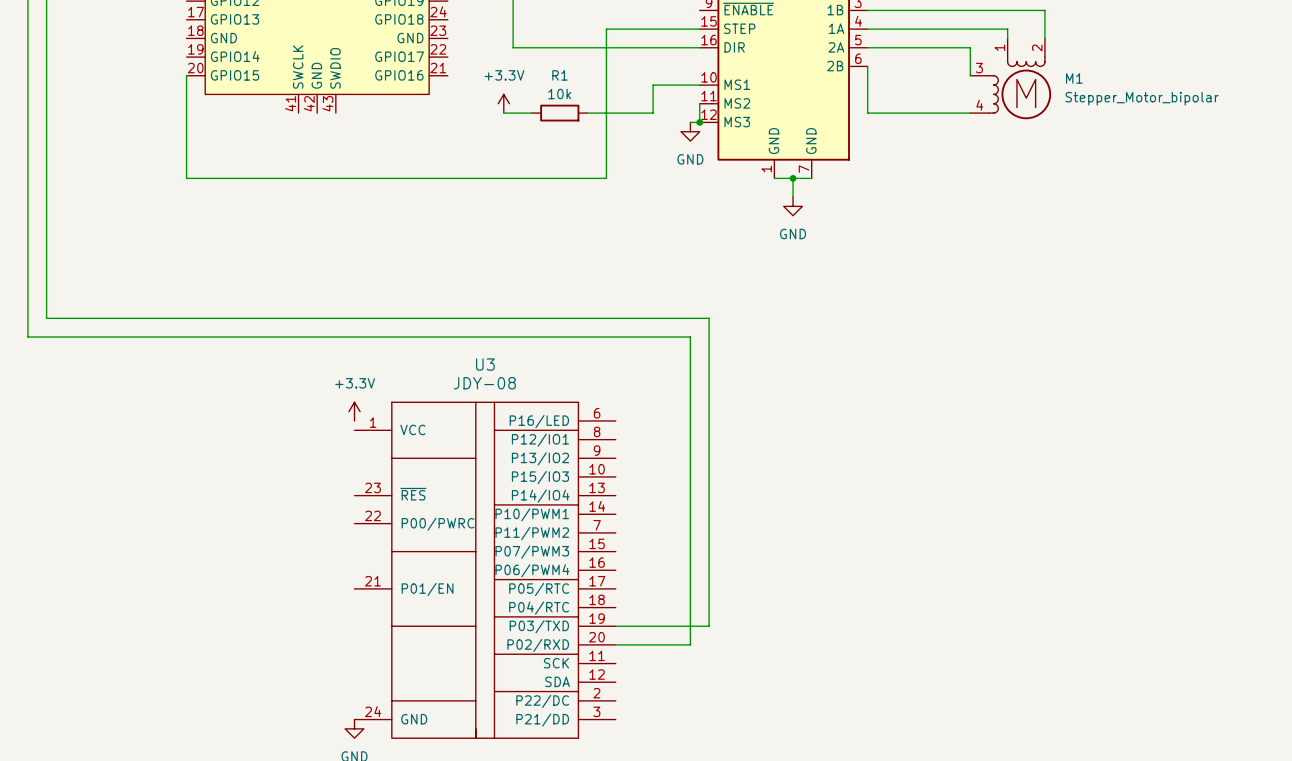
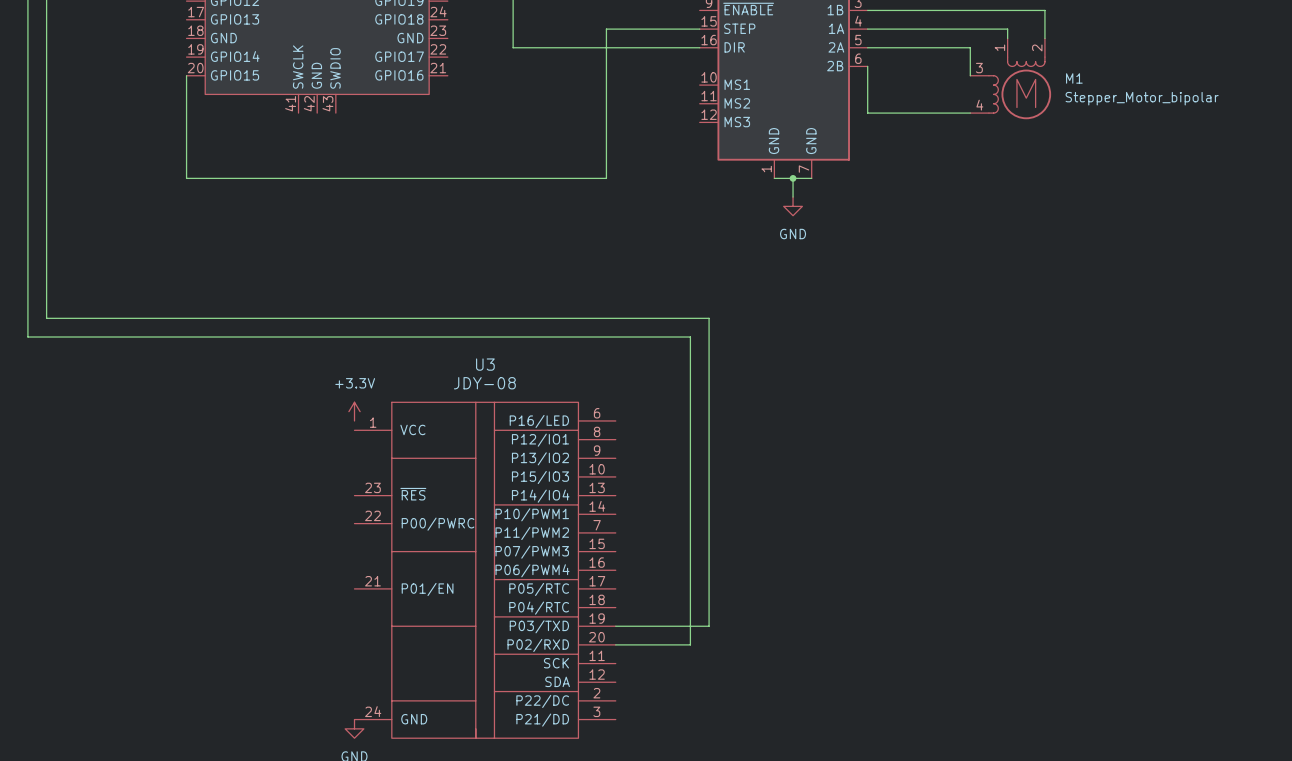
wire: (699, 85) (653, 85) (653, 113) (587, 113) -> none
power symbol: +3.3V (503, 103) -> none
wire: (699, 103) (699, 122) (690, 122) -> none
wire: (503, 113) (531, 113) -> none
R1: 10k (559, 113) -> none
junction: (699, 122) -> none
power symbol: GND (690, 131) -> none

